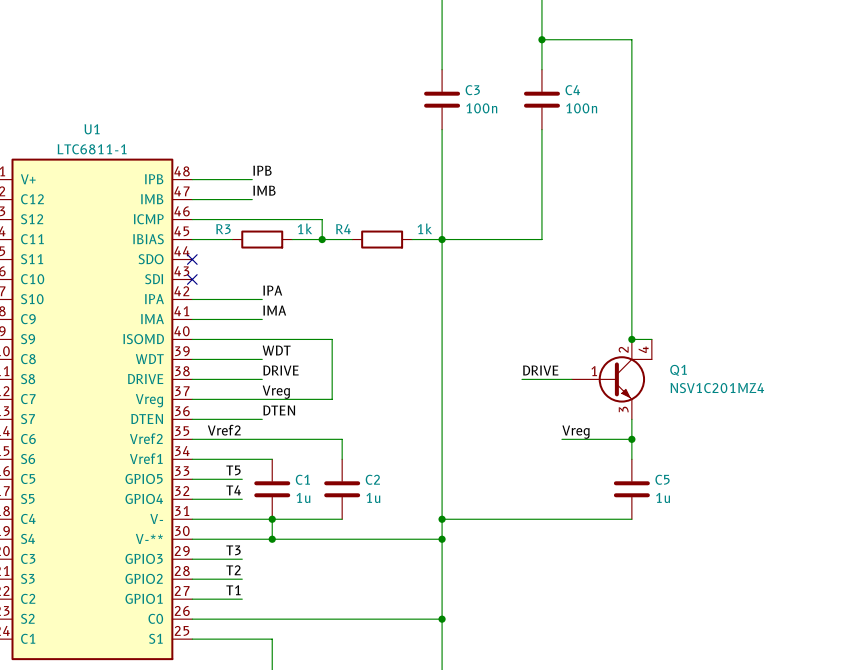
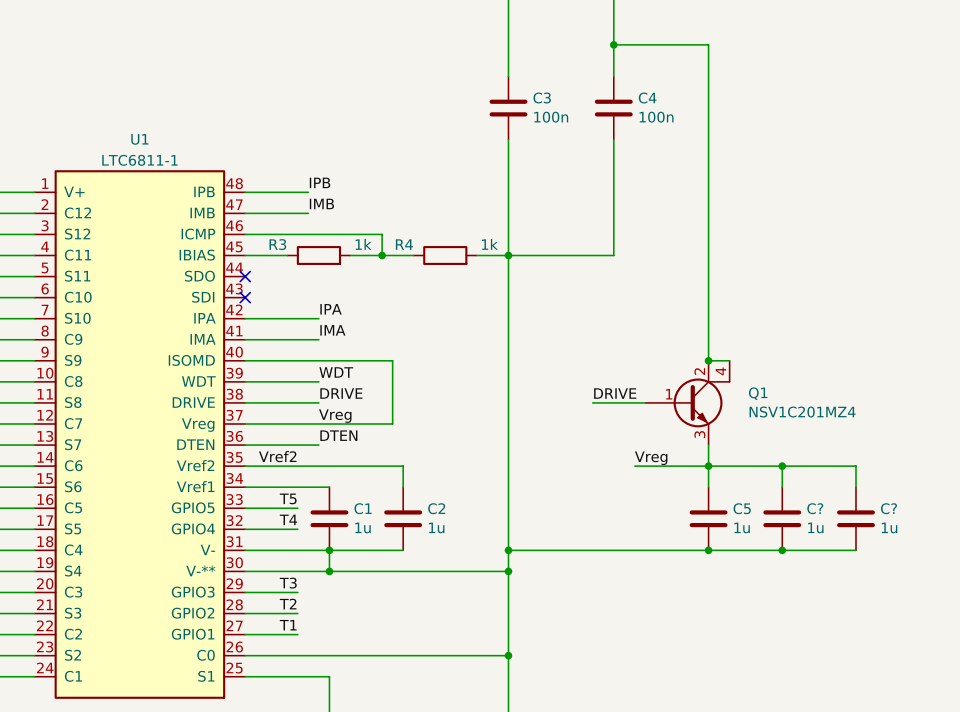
wire: none -> (708, 466) (855, 466) (855, 487)
wire: none -> (782, 466) (782, 487)
junction: none -> (782, 466)
C?: none -> 1u (782, 518)
C?: none -> 1u (855, 518)
wire: none -> (708, 550) (855, 550)
junction: none -> (708, 550)
junction: none -> (782, 550)

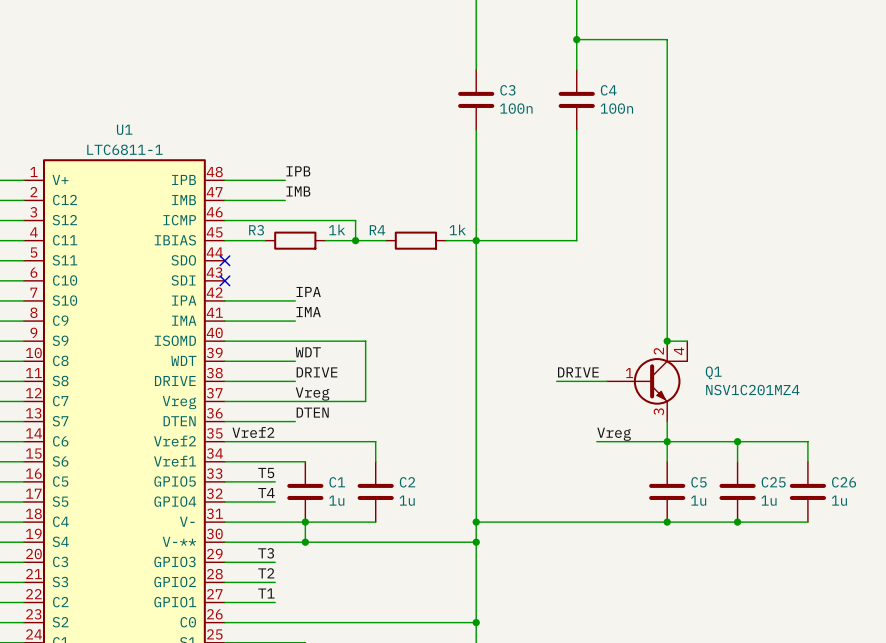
C? name: C? (815, 508) -> C25 (773, 482)
C? name: C? (888, 508) -> C26 (844, 482)

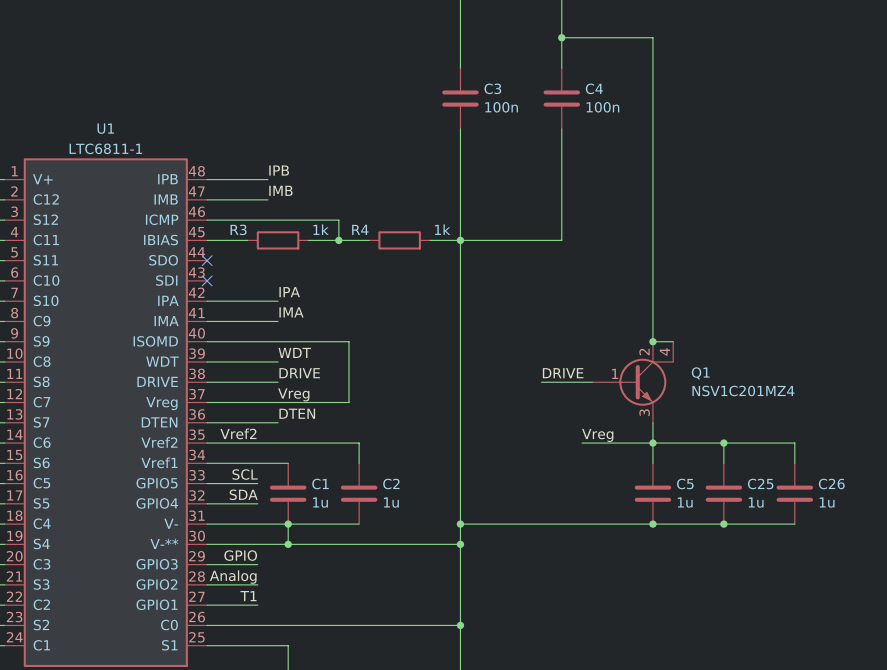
label: T5 (266, 473) -> SCL (245, 474)
label: T4 (266, 493) -> SDA (243, 494)
label: T3 (266, 553) -> GPIO (240, 555)
label: T2 (266, 573) -> Analog (233, 577)

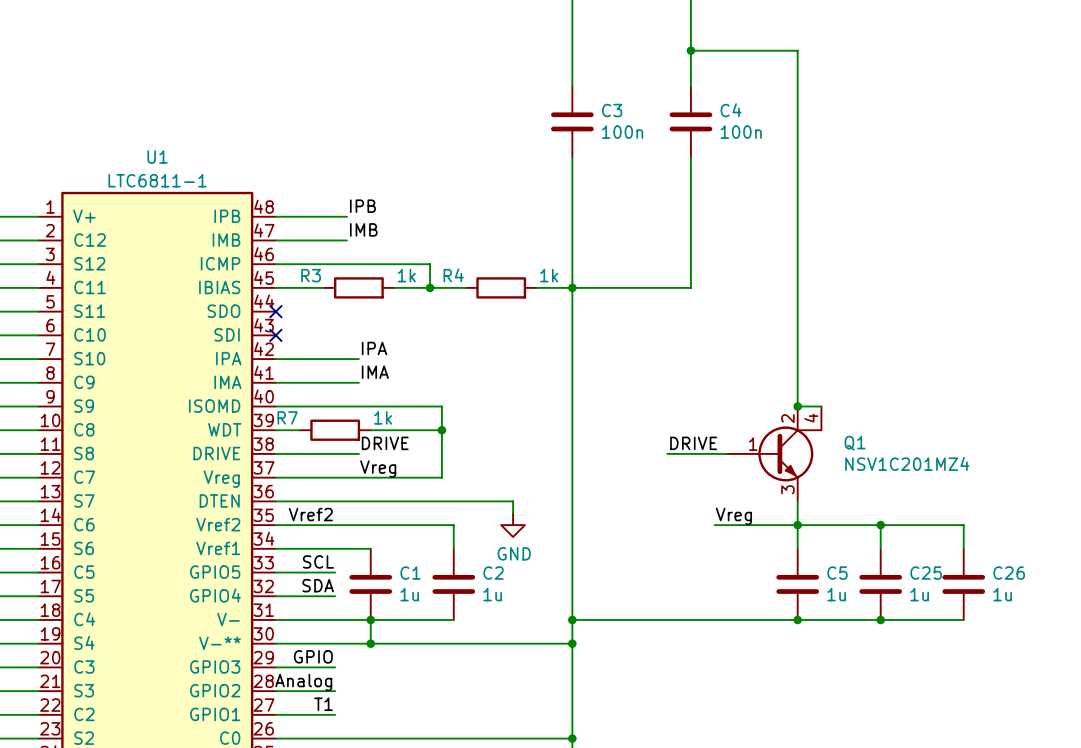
label: WDT (294, 352) -> none
wire: (227, 361) (278, 361) -> none
R7: none -> 1k (335, 430)
wire: none -> (370, 430) (441, 430)
junction: none -> (441, 430)
label: DTEN (297, 413) -> none
wire: none -> (358, 501) (513, 501) (513, 513)
power symbol: none -> GND (513, 525)

